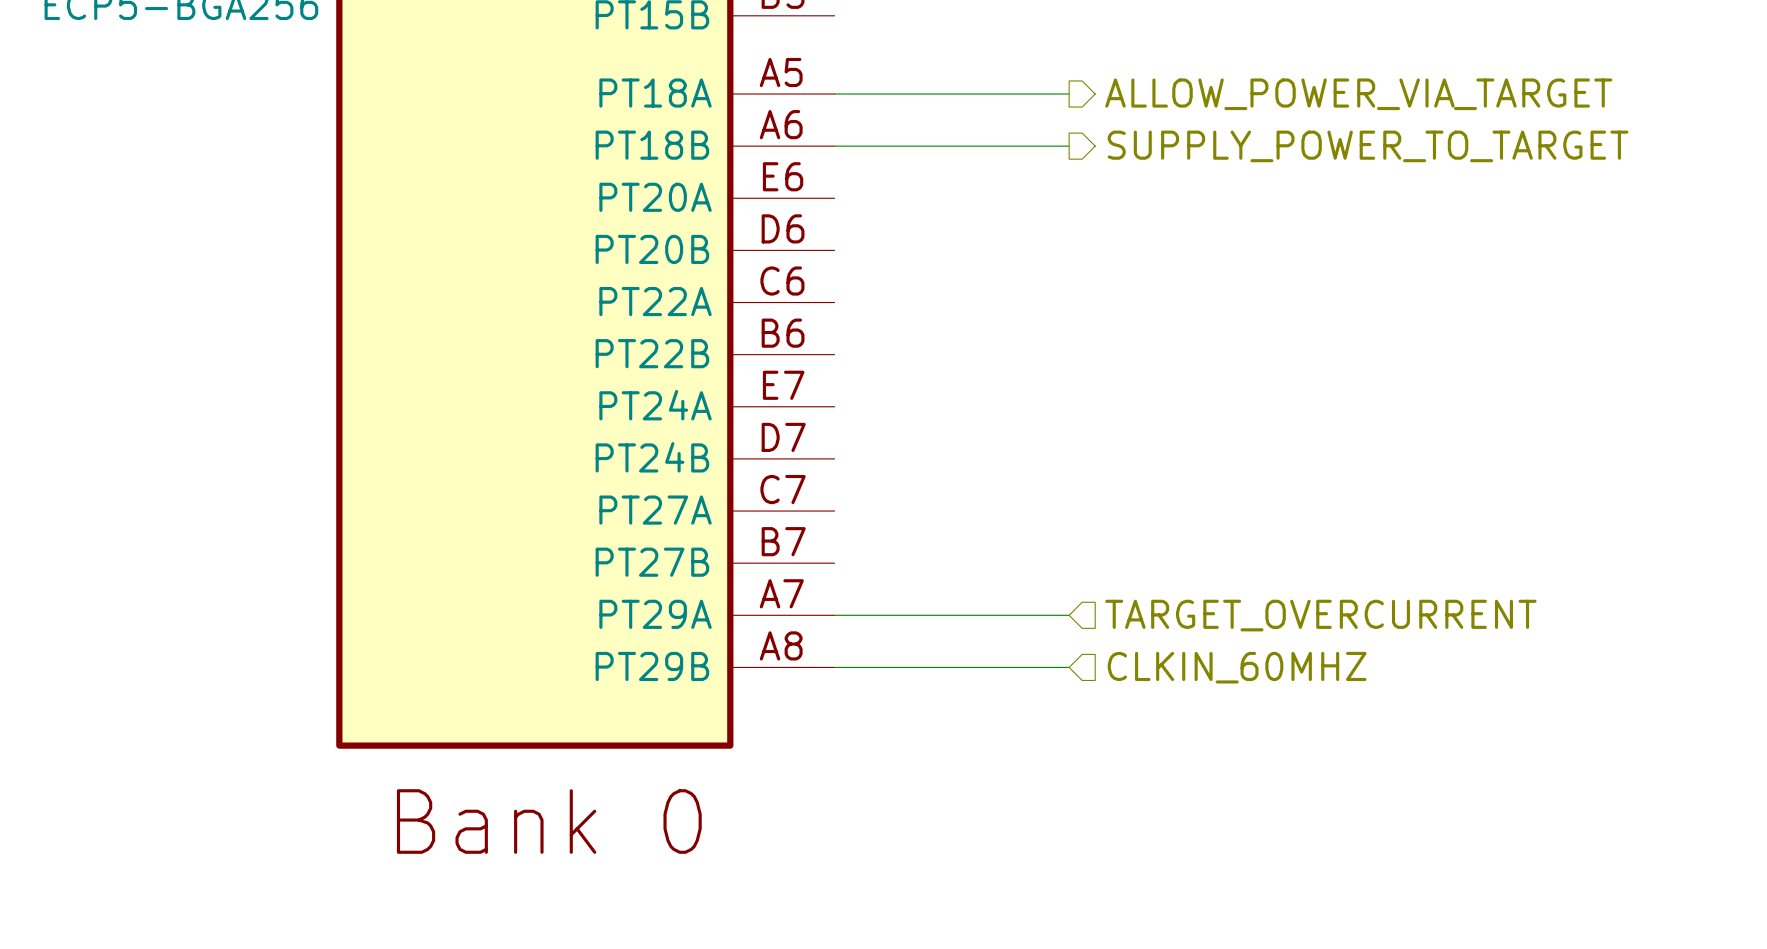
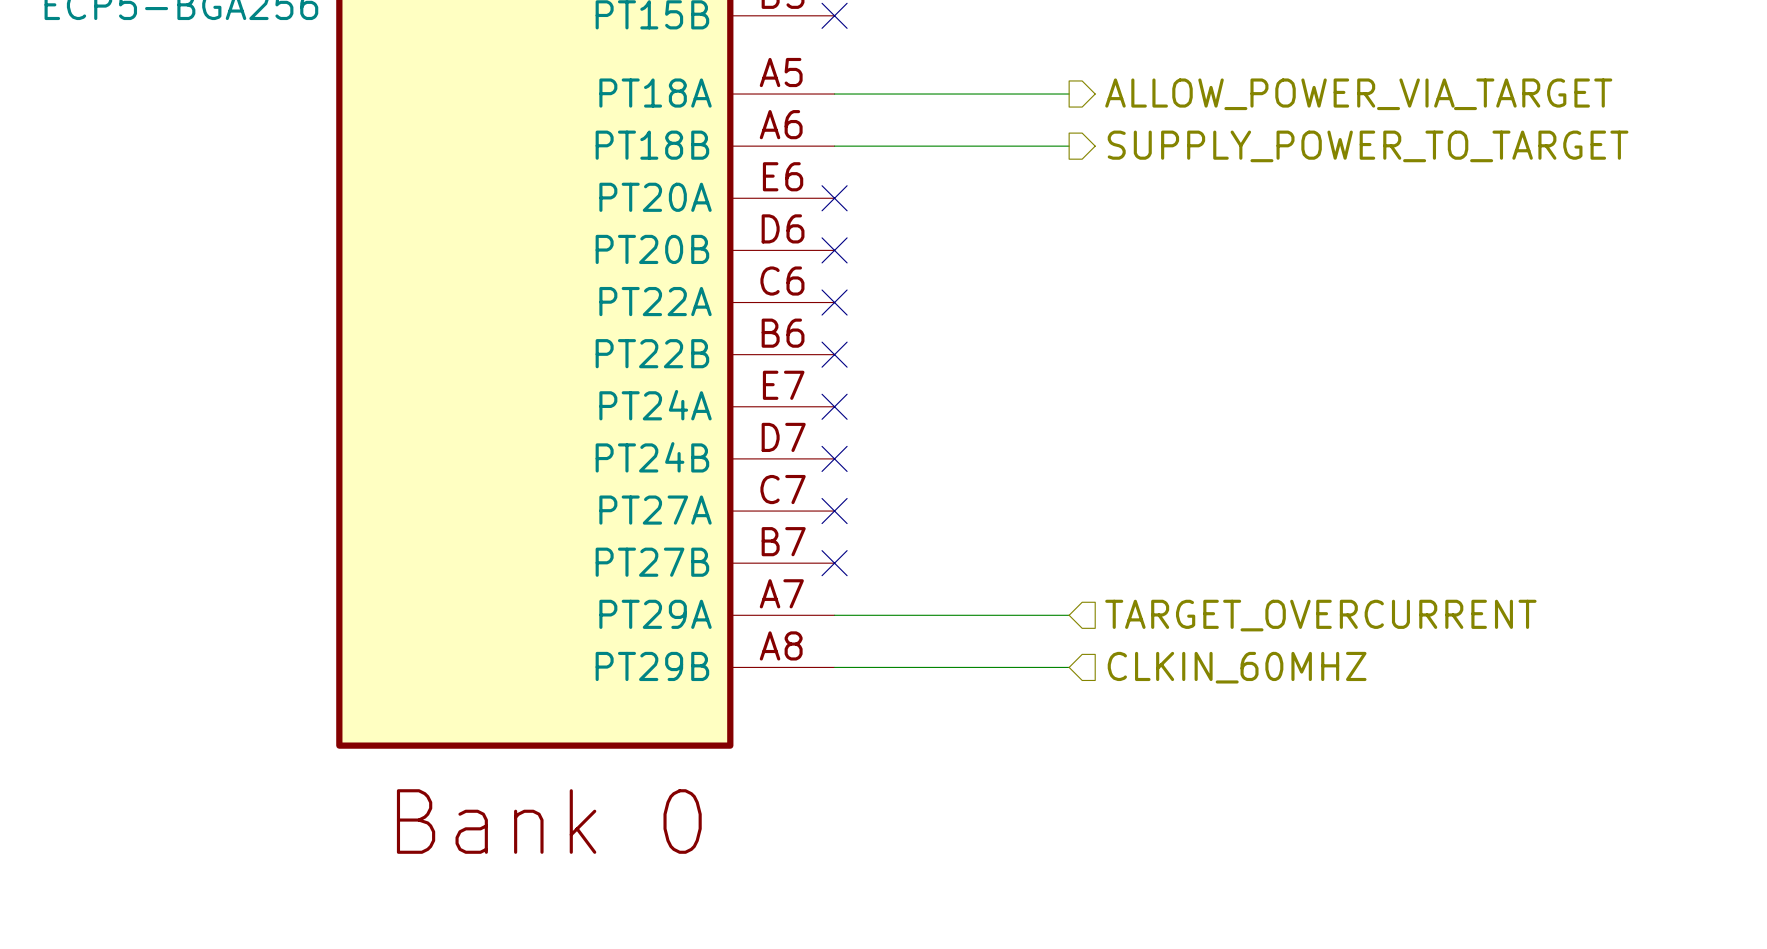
no-connect mark: none -> (834, 15)
no-connect mark: none -> (834, 198)
no-connect mark: none -> (834, 250)
no-connect mark: none -> (834, 302)
no-connect mark: none -> (834, 354)
no-connect mark: none -> (834, 406)
no-connect mark: none -> (834, 458)
no-connect mark: none -> (834, 511)
no-connect mark: none -> (834, 563)

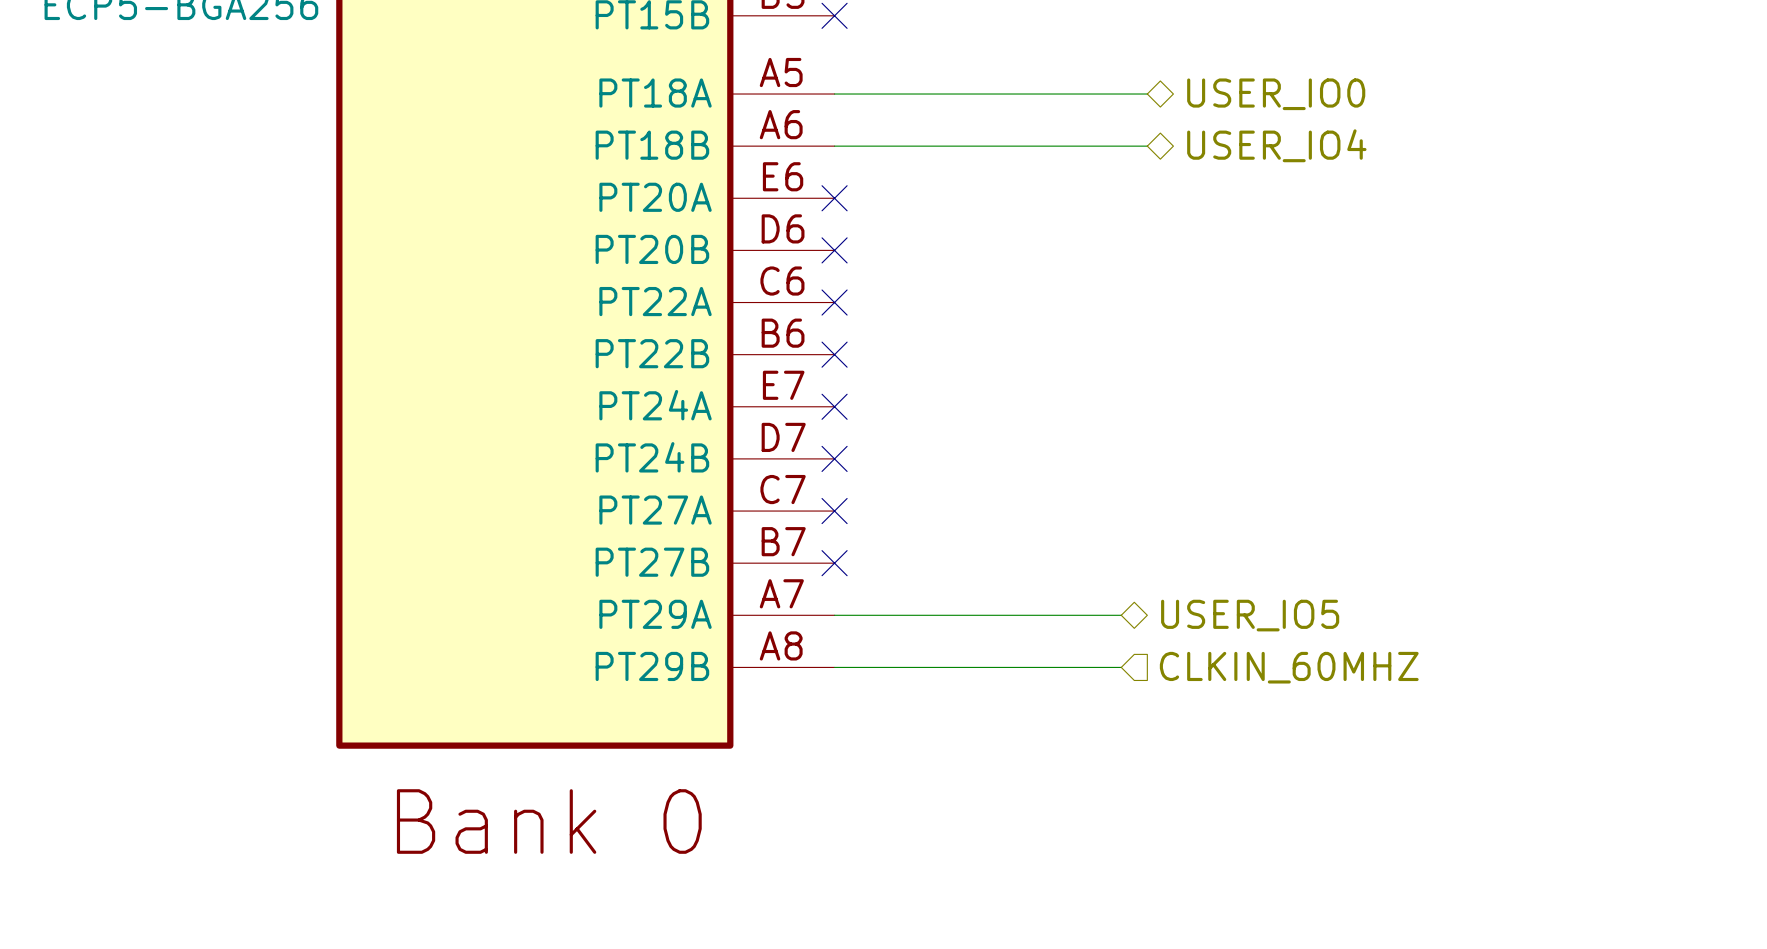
wire: none -> (1069, 94) (1147, 94)
hierarchical label: none -> USER_IO0 (1276, 94)
hierarchical label: ALLOW_POWER_VIA_TARGET (1358, 94) -> none
hierarchical label: none -> USER_IO4 (1276, 145)
wire: none -> (1069, 146) (1147, 146)
hierarchical label: SUPPLY_POWER_TO_TARGET (1368, 146) -> none
wire: none -> (1069, 615) (1121, 615)
hierarchical label: none -> USER_IO5 (1250, 615)
hierarchical label: TARGET_OVERCURRENT (1320, 615) -> none
wire: none -> (1069, 667) (1121, 667)
hierarchical label position: CLKIN_60MHZ (1237, 667) -> CLKIN_60MHZ (1289, 667)

